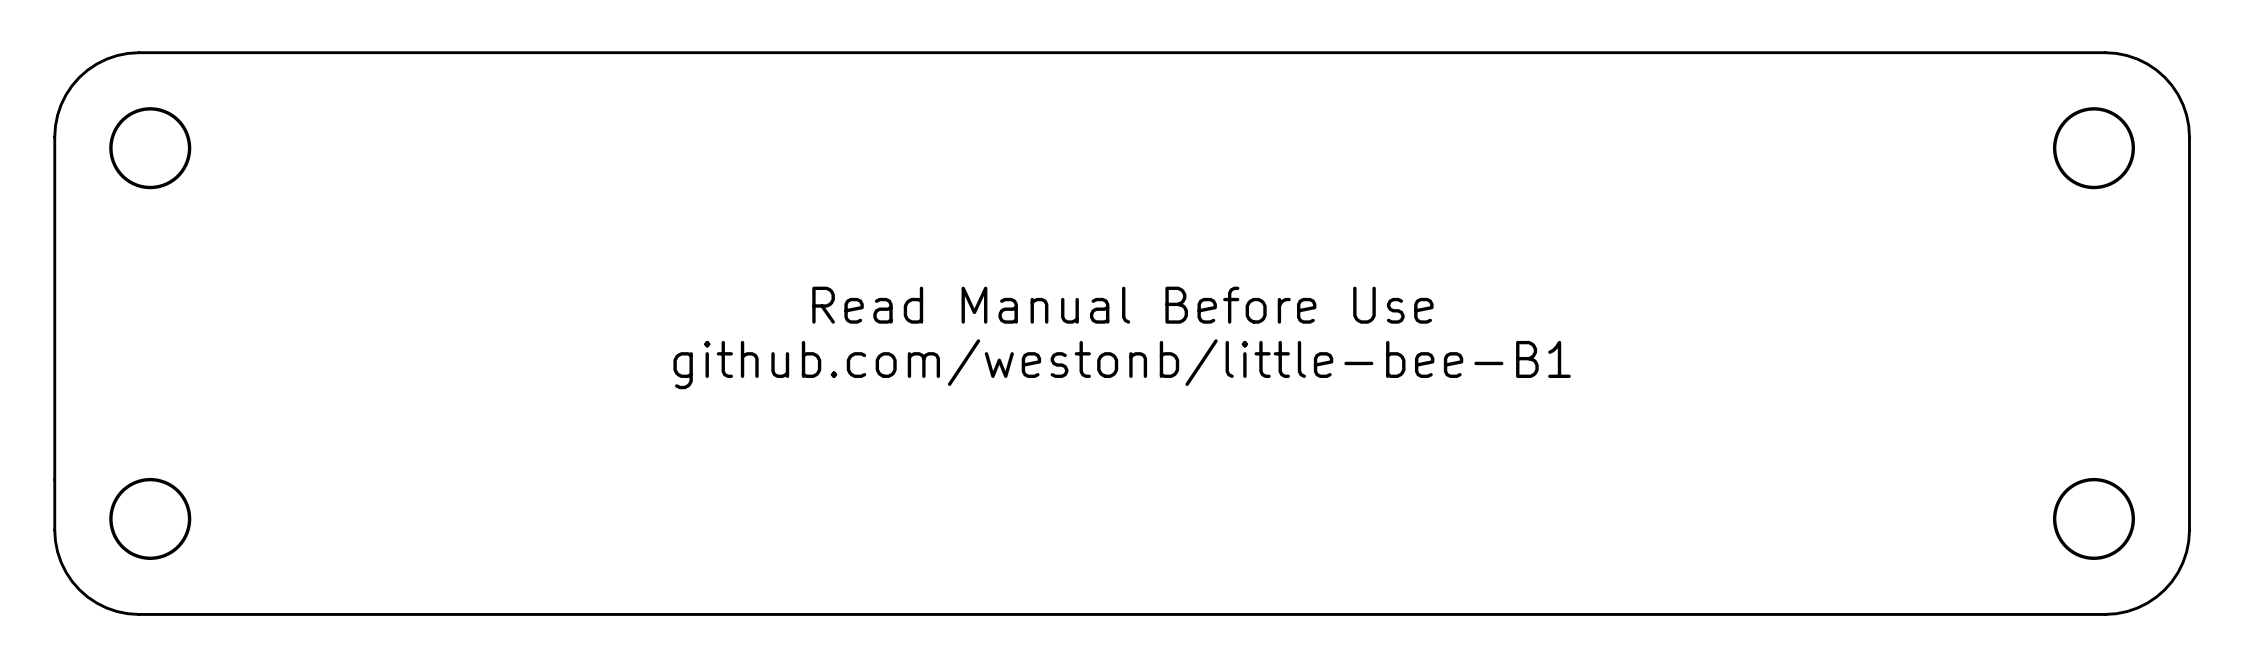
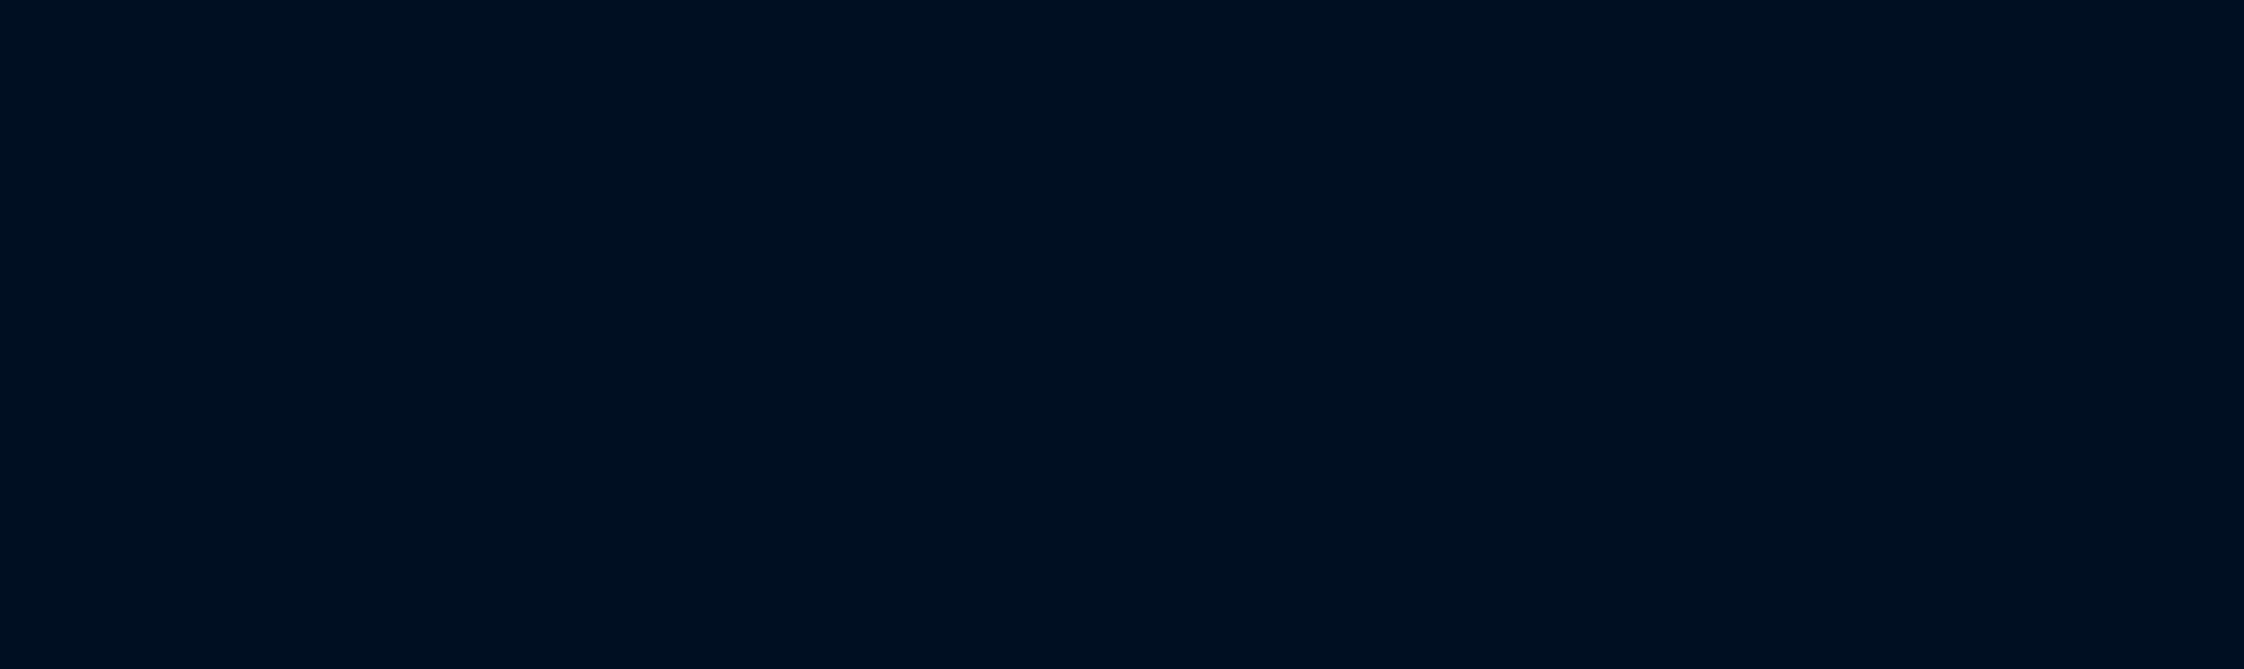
board edge: (139, 52) (2105, 52) (2127, 55) (2156, 70) (2172, 85) (2183, 104) (2188, 125) (2189, 530) (2186, 552) (2172, 581) (2156, 597) (2137, 608) (2105, 614) (139, 614) (117, 611) (96, 603) (72, 581) (61, 562) (55, 541) (54, 136) (61, 104) (79, 77) (106, 59) (139, 52) -> none
round board edge: [109, 107, 192, 190] -> none
round board edge: [2052, 107, 2136, 190] -> none
text: Read Manual Before Use (1122, 305) -> none
text: github.com/westonb/little-bee-B1 (1122, 364) -> none
round board edge: [109, 477, 192, 560] -> none
round board edge: [2052, 477, 2136, 560] -> none

